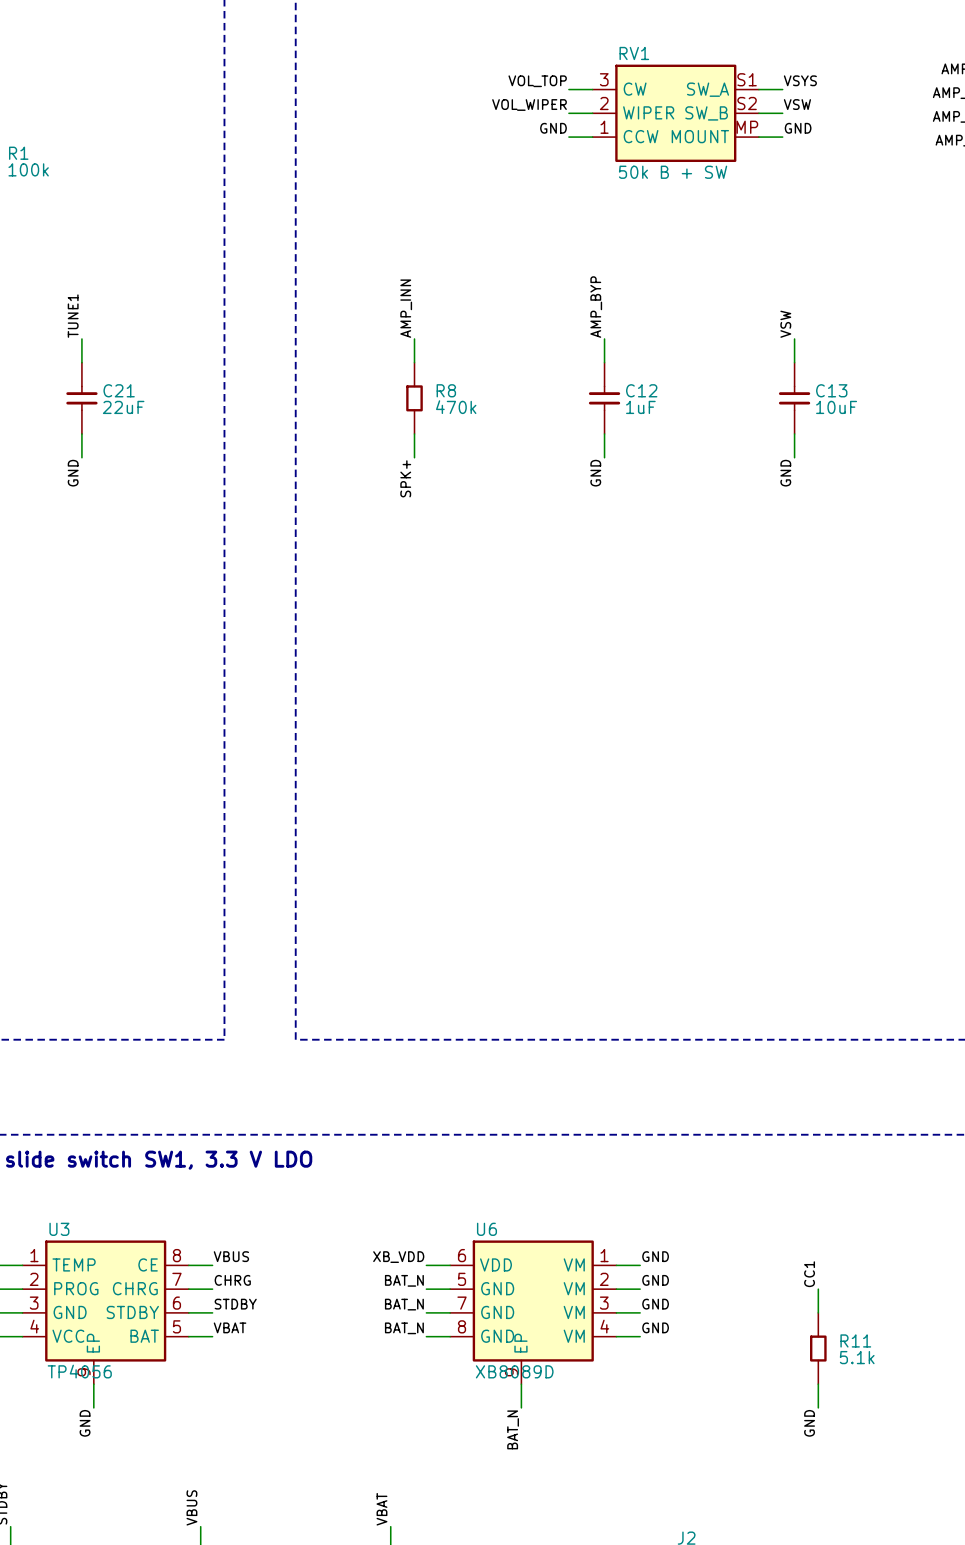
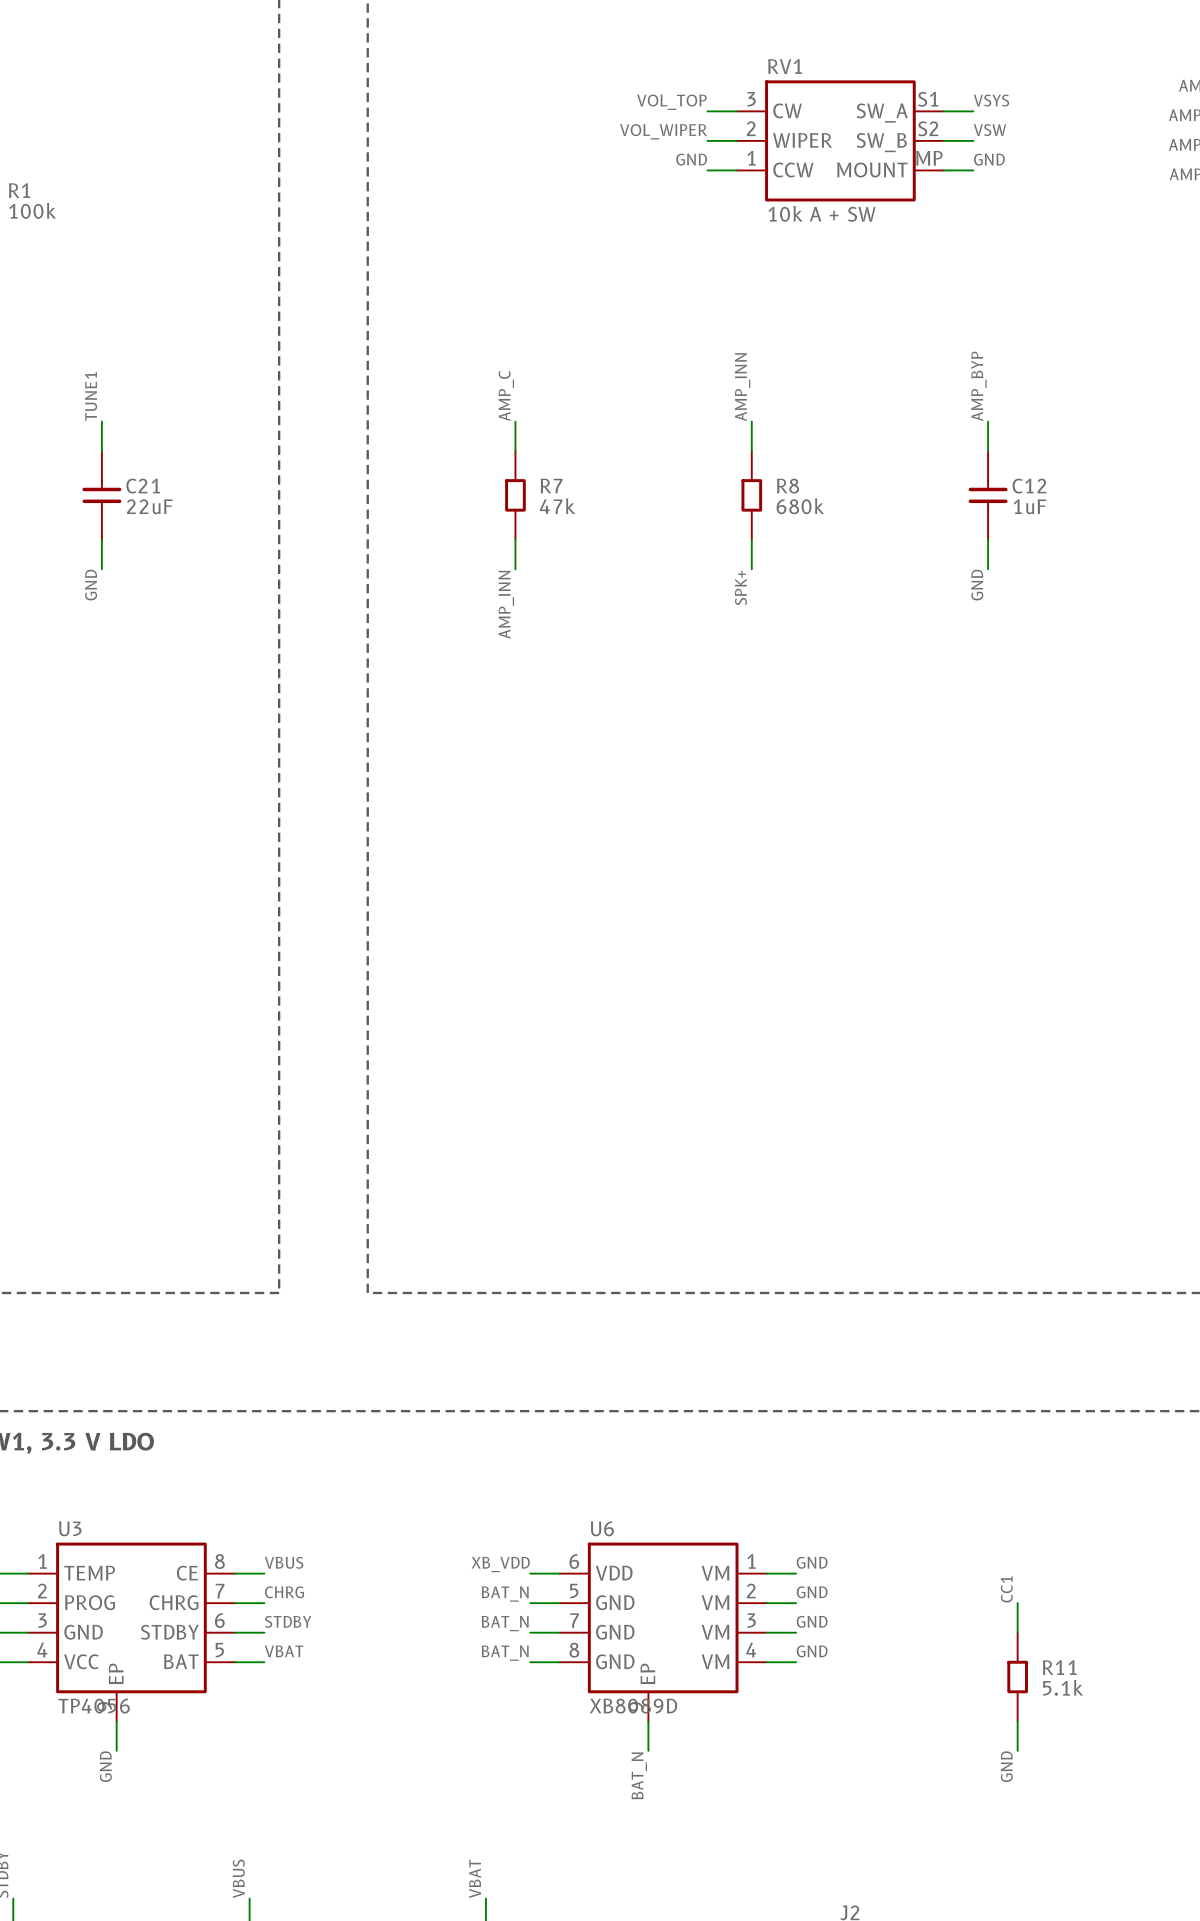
RV1 value: 50k B + SW (673, 172) -> 10k A + SW (822, 213)
label: AMP_BYP (596, 307) -> AMP_INN (742, 387)
label: AMP_INN (406, 308) -> AMP_C (506, 395)
label: VSW (785, 324) -> AMP_BYP (978, 386)
R8 name: R8 (446, 390) -> R7 (551, 486)
C13 name: C13 (831, 390) -> C12 (1029, 486)
C12: 1uF (604, 398) -> none
R8: none -> 680k (751, 495)
R8 value: 470k (456, 407) -> 47k (557, 506)
C13 value: 10uF (836, 407) -> 1uF (1029, 506)
label: GND (595, 473) -> SPK+ (740, 587)
label: SPK+ (405, 478) -> AMP_INN (506, 604)

